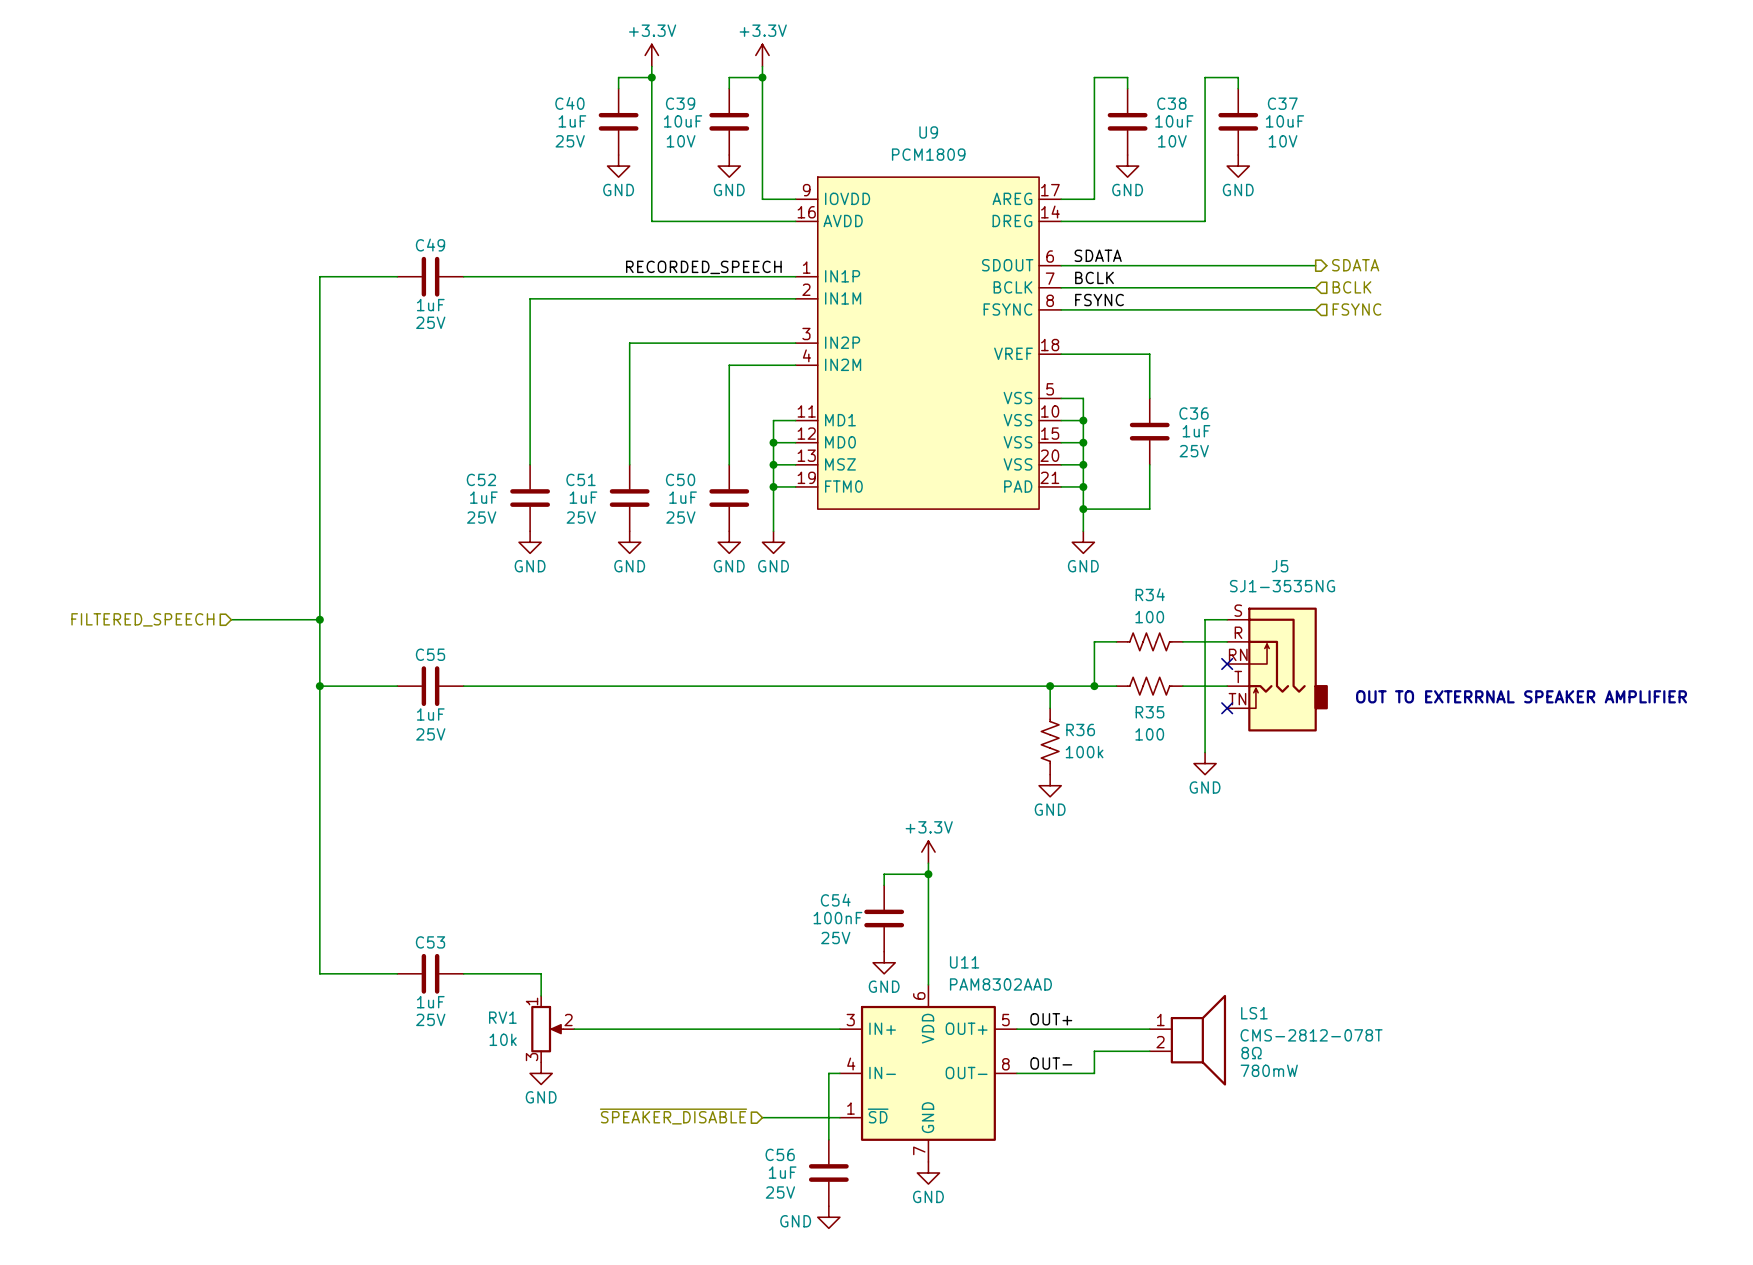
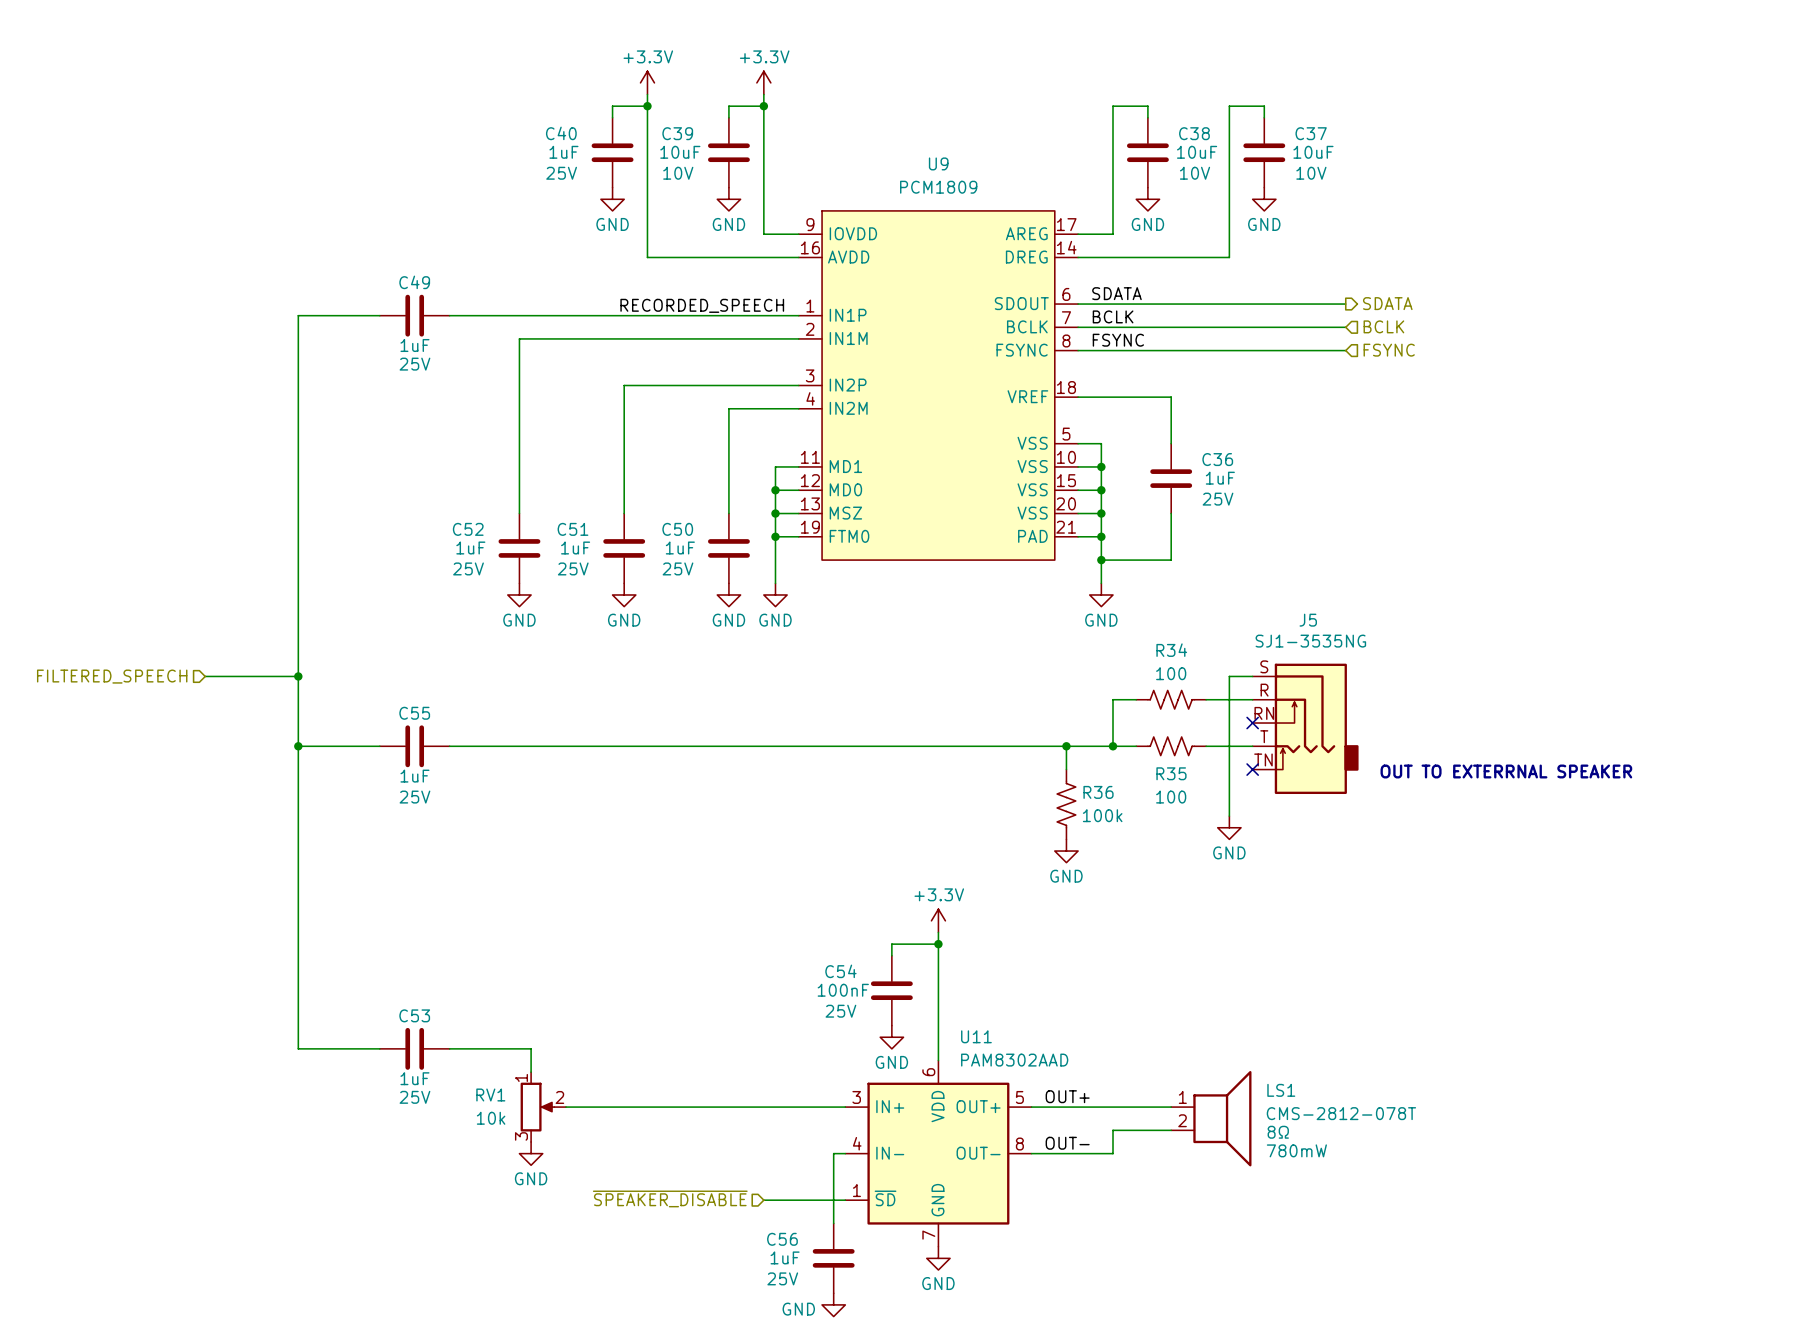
text: OUT TO EXTERRNAL SPEAKER AMPLIFIER (1521, 696) -> OUT TO EXTERRNAL SPEAKER (1506, 771)

